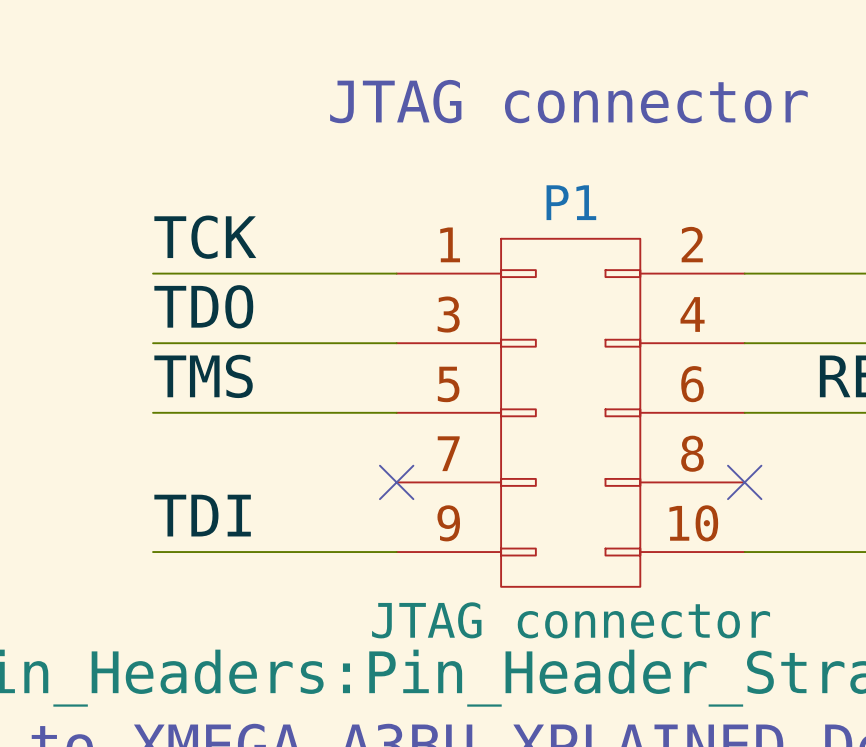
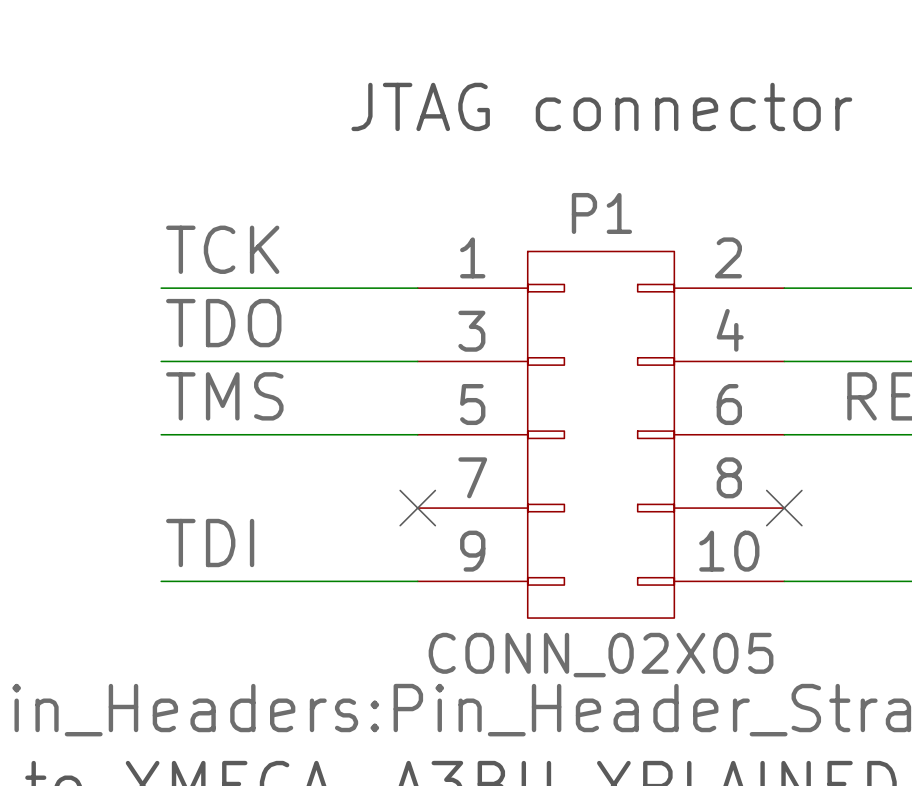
P1 value: JTAG connector (571, 620) -> CONN_02X05 (601, 655)

